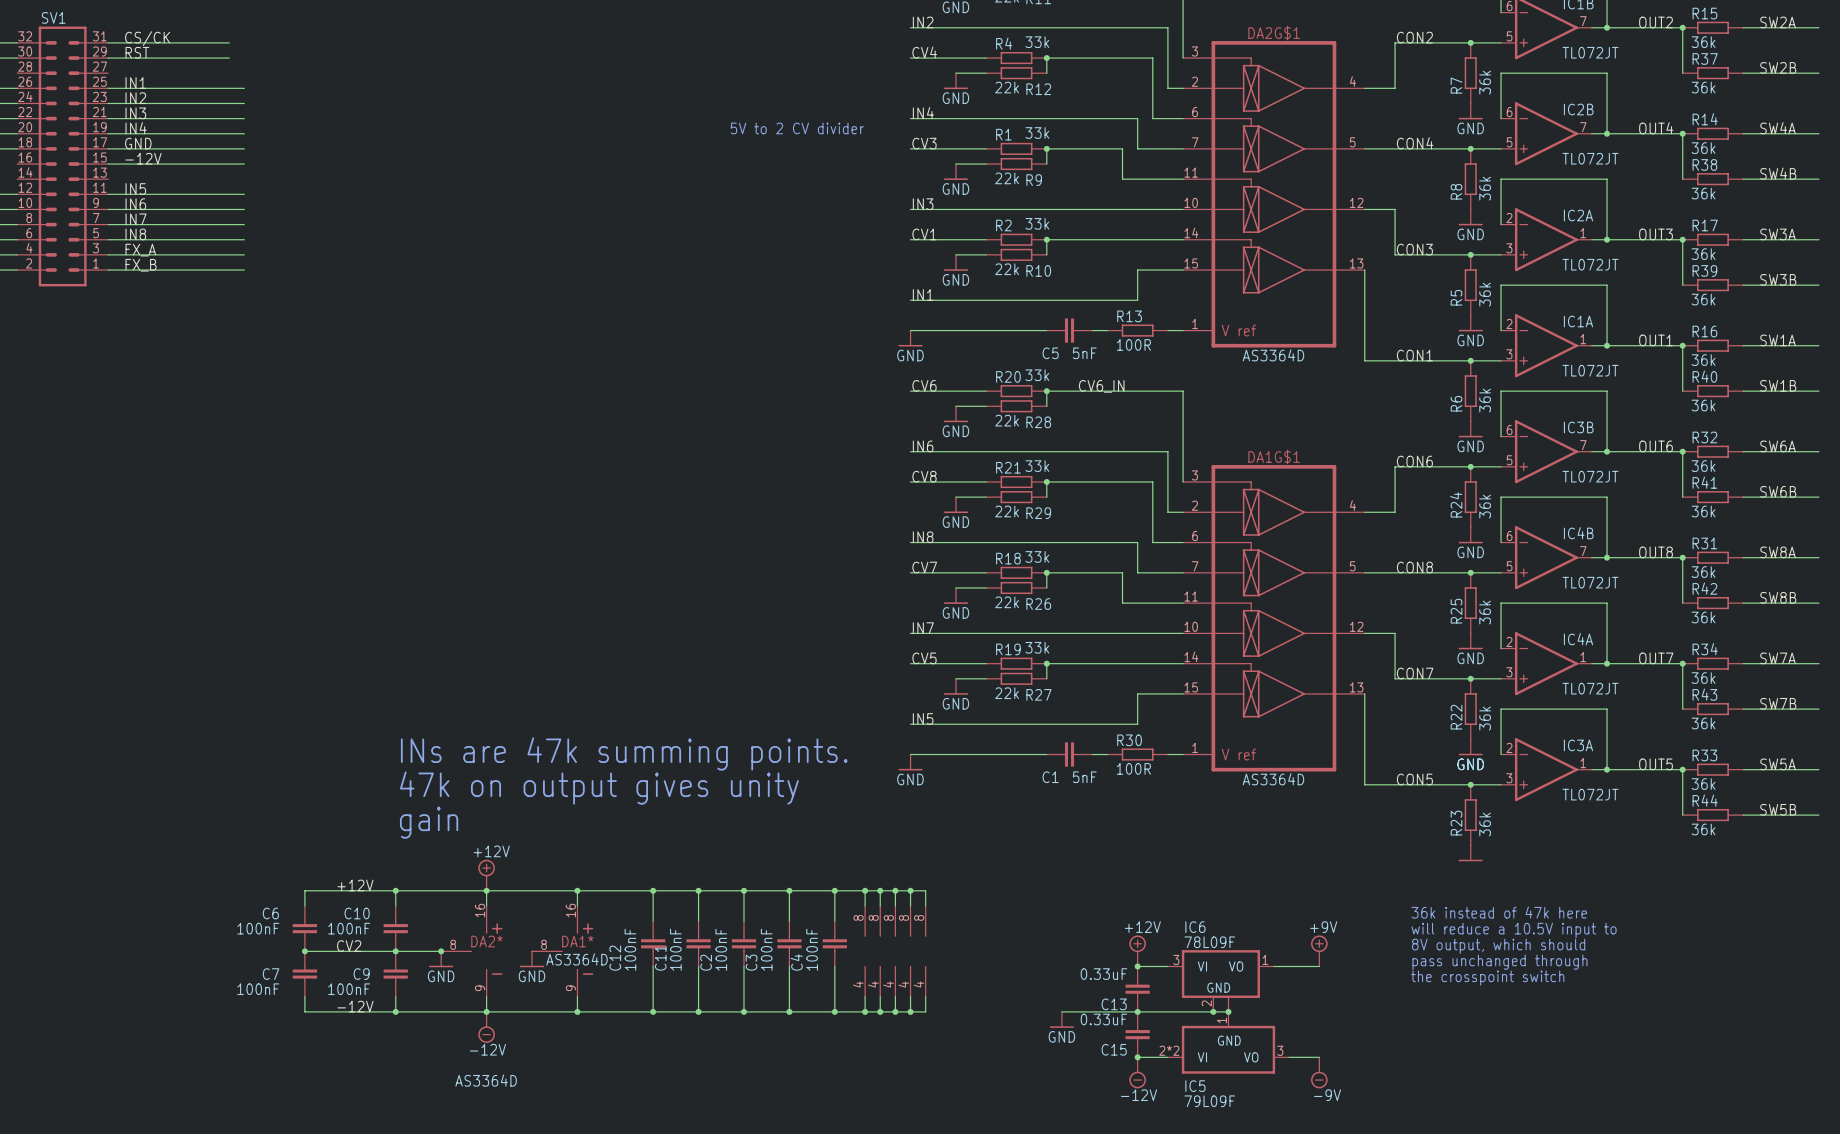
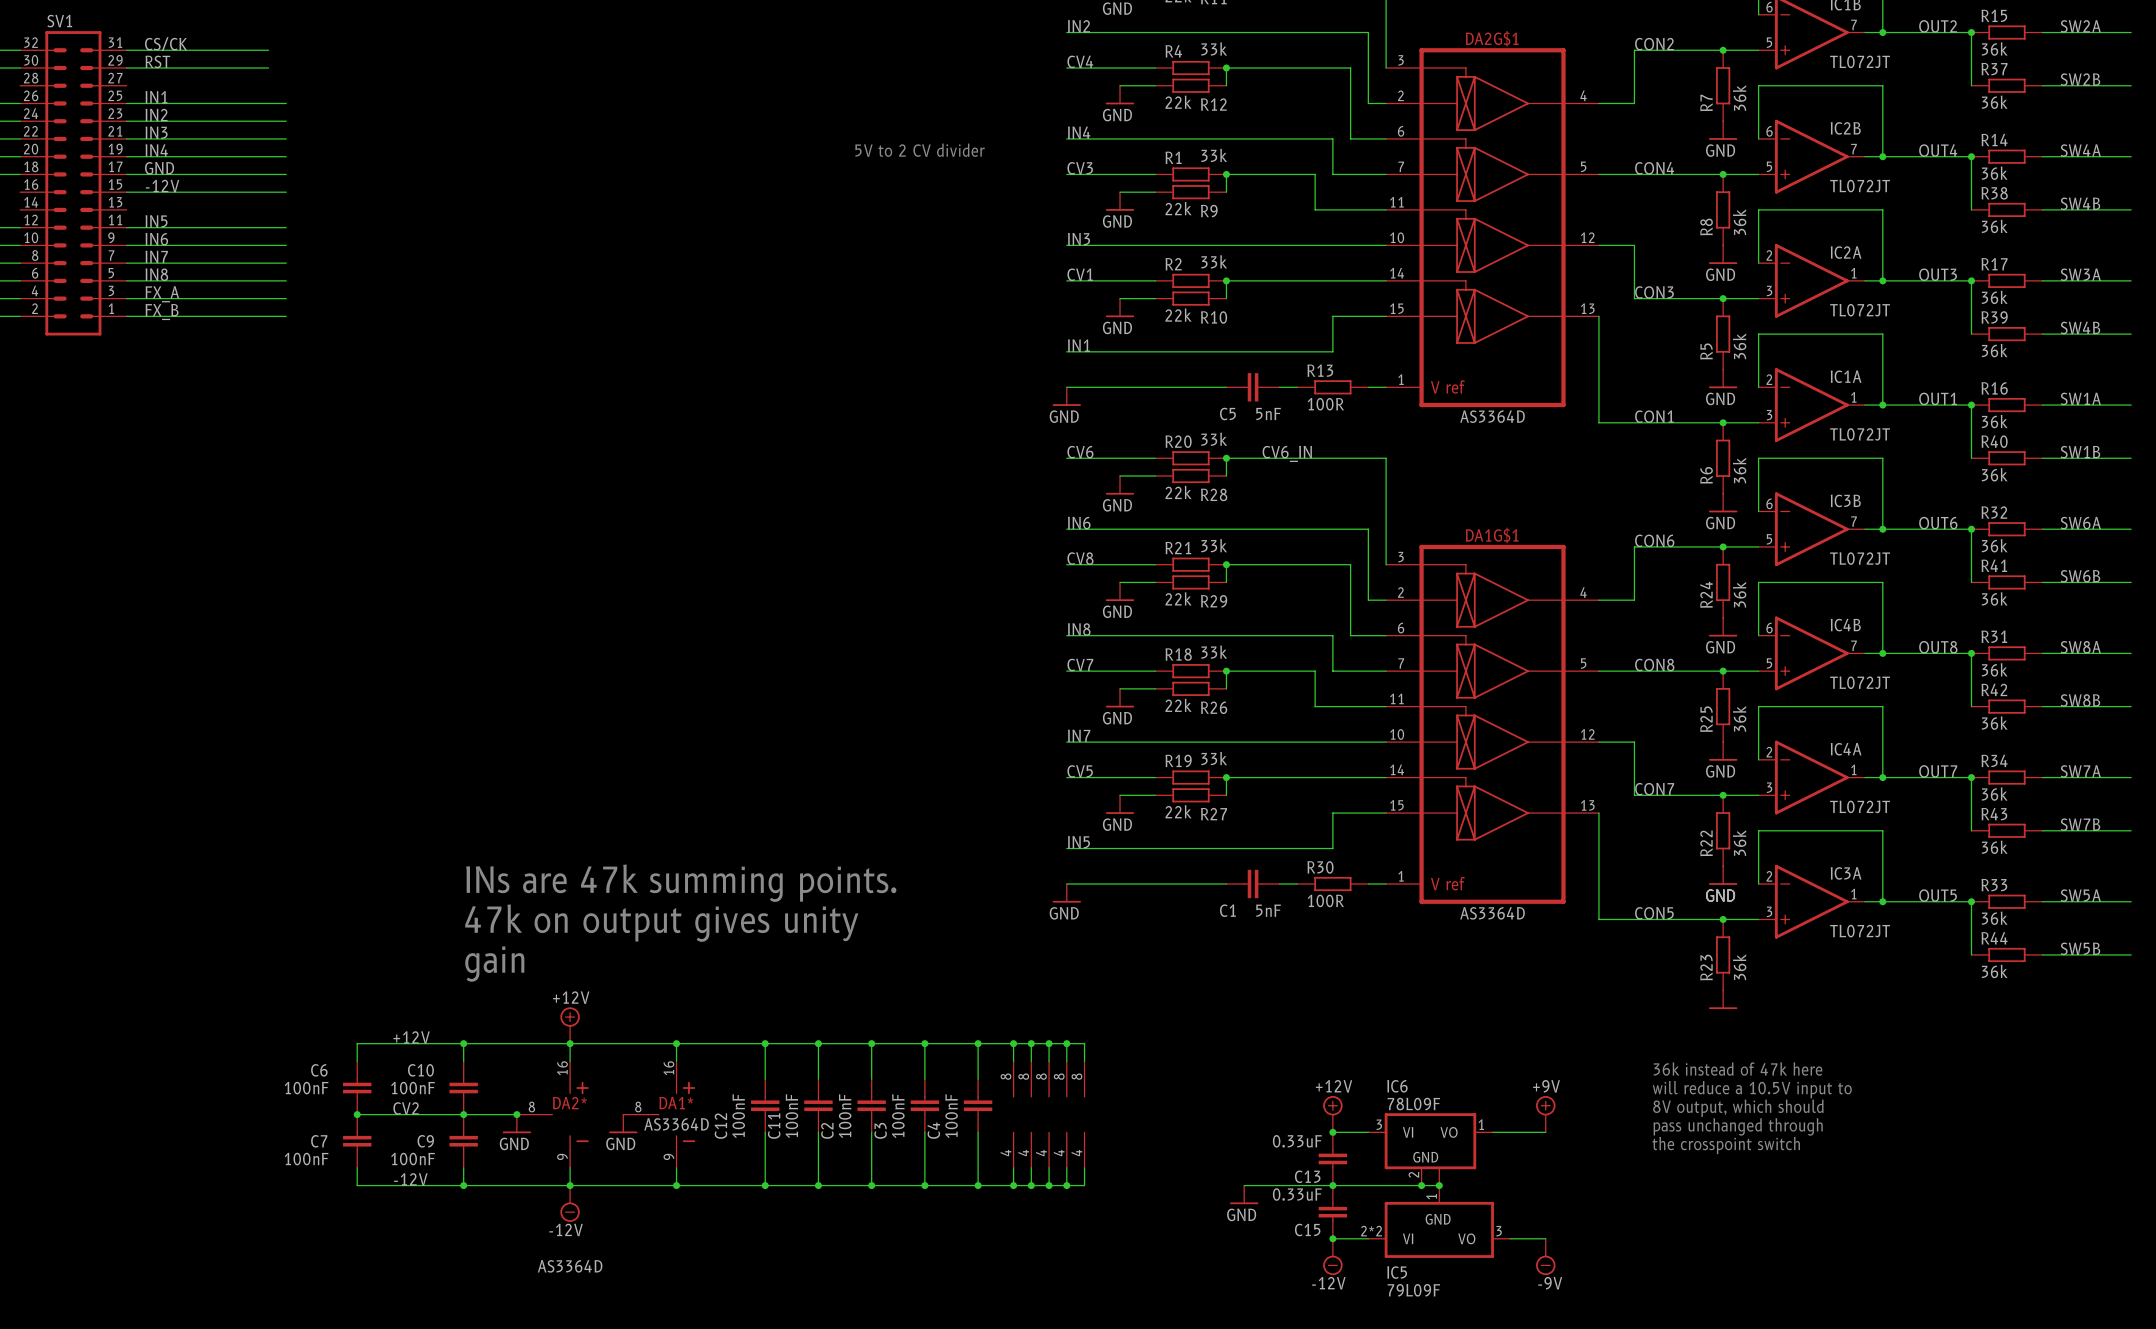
label: SW3B (1778, 279) -> SW4B (2080, 327)

